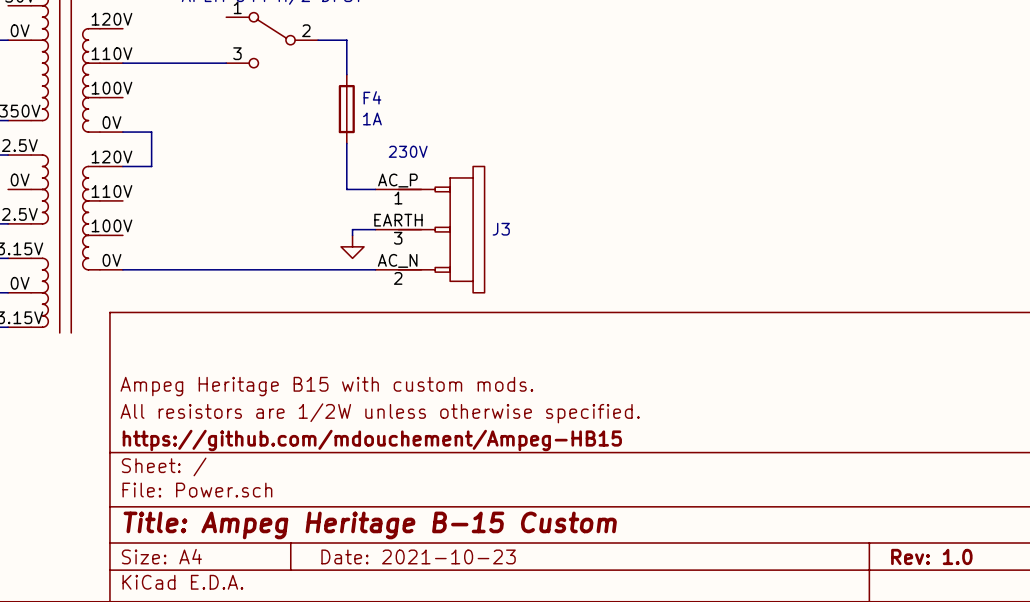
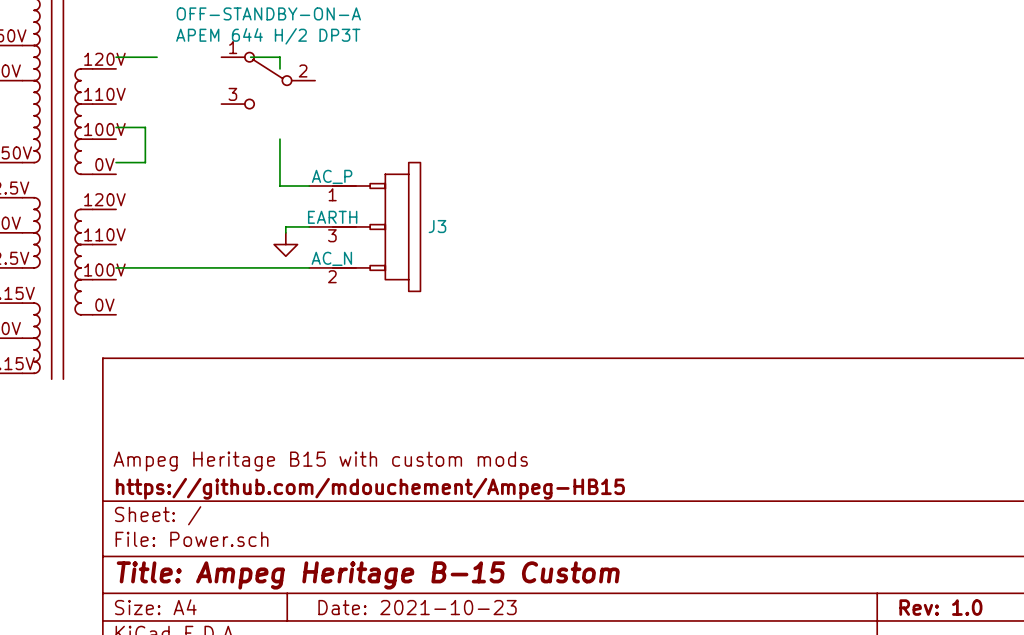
wire: none -> (116, 57) (157, 57)
wire: none -> (250, 57) (279, 57) (279, 68)
wire: (318, 40) (346, 40) (346, 74) -> none
wire: (122, 63) (226, 63) -> none
F4: 1A (346, 109) -> none
wire: (122, 132) (151, 132) (151, 166) (122, 166) -> (116, 127) (145, 127) (145, 162) (116, 162)
wire: (346, 143) (346, 189) (375, 189) -> (279, 139) (279, 186) (309, 186)
text: 230V (408, 151) -> none
wire: none -> (116, 267) (309, 267)
wire: (375, 229) (352, 229) (352, 235) -> (309, 226) (285, 226) (285, 232)
J3 position: (430, 229) -> (364, 226)
power symbol position: (352, 246) -> (285, 244)
wire: (122, 269) (375, 269) -> none
title block: Ampeg Heritage B15 with custom mods. (326, 386) -> none
title block: All resistors are 1/2W unless otherwise specified. (380, 413) -> Ampeg Heritage B15 with custom mods (320, 461)

